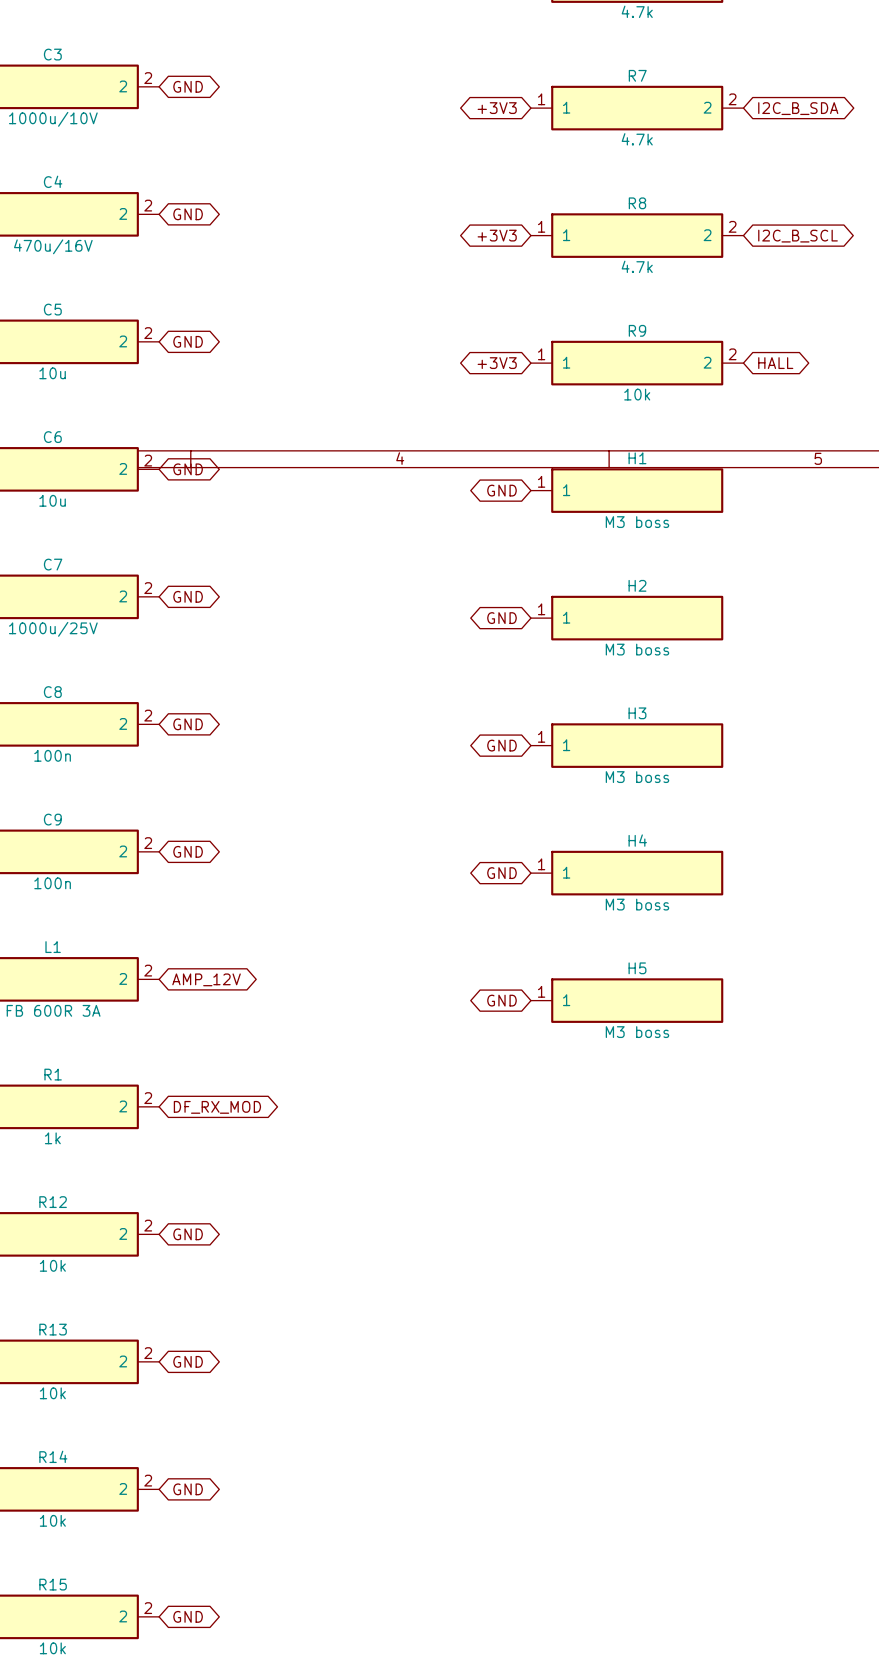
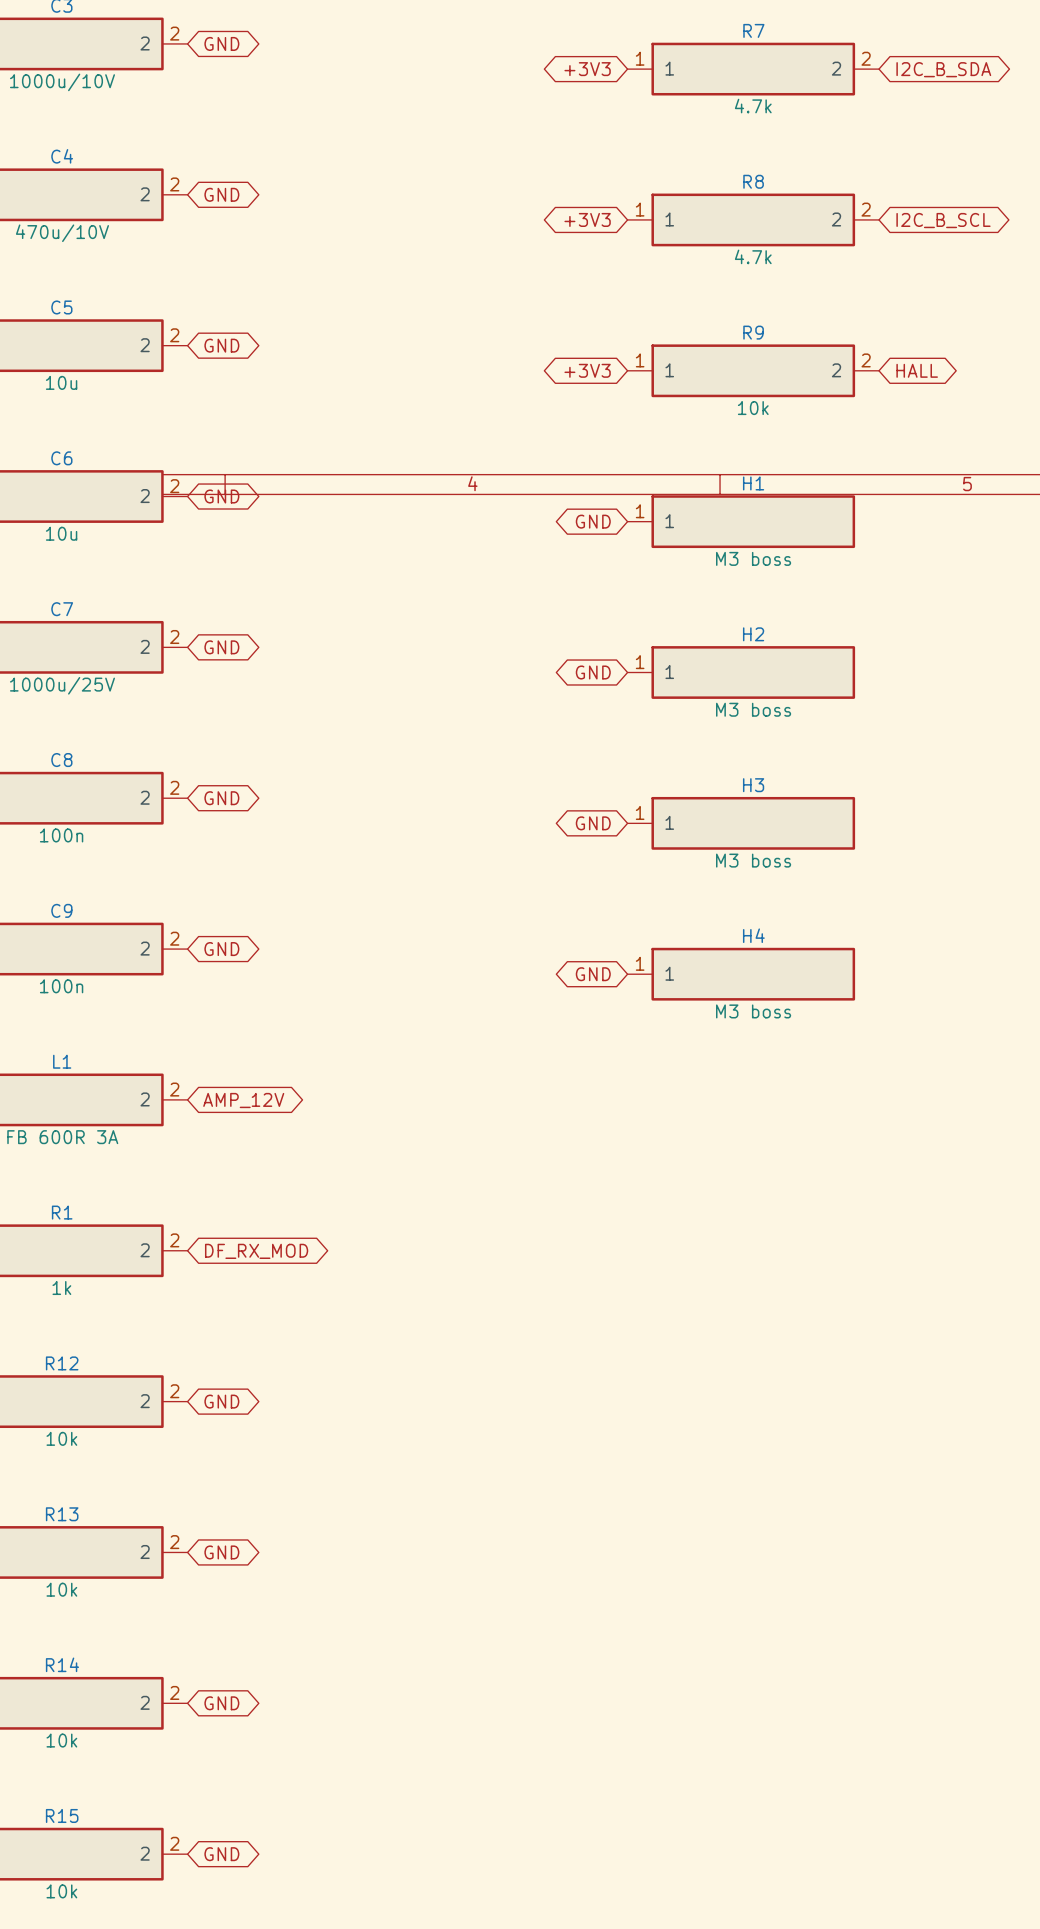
C4 value: 470u/16V (53, 246) -> 470u/10V (62, 233)
global label: GND (501, 1000) -> none
H5: M3 boss (627, 1000) -> none

